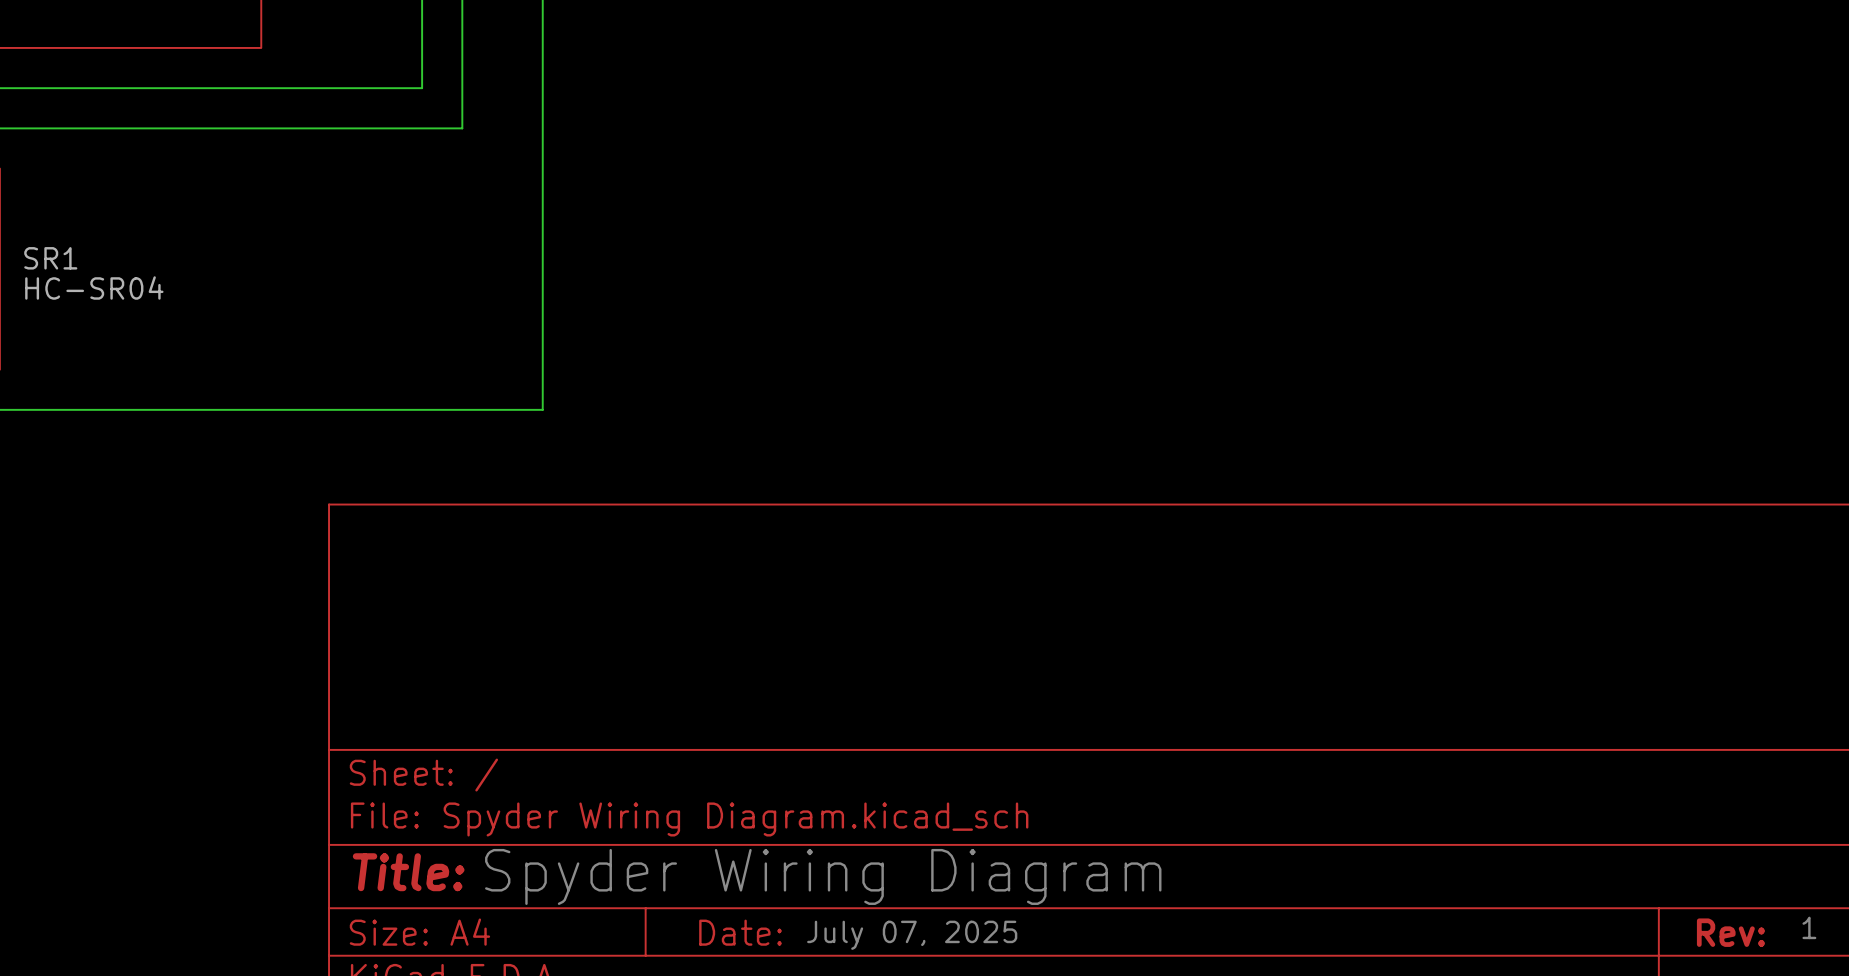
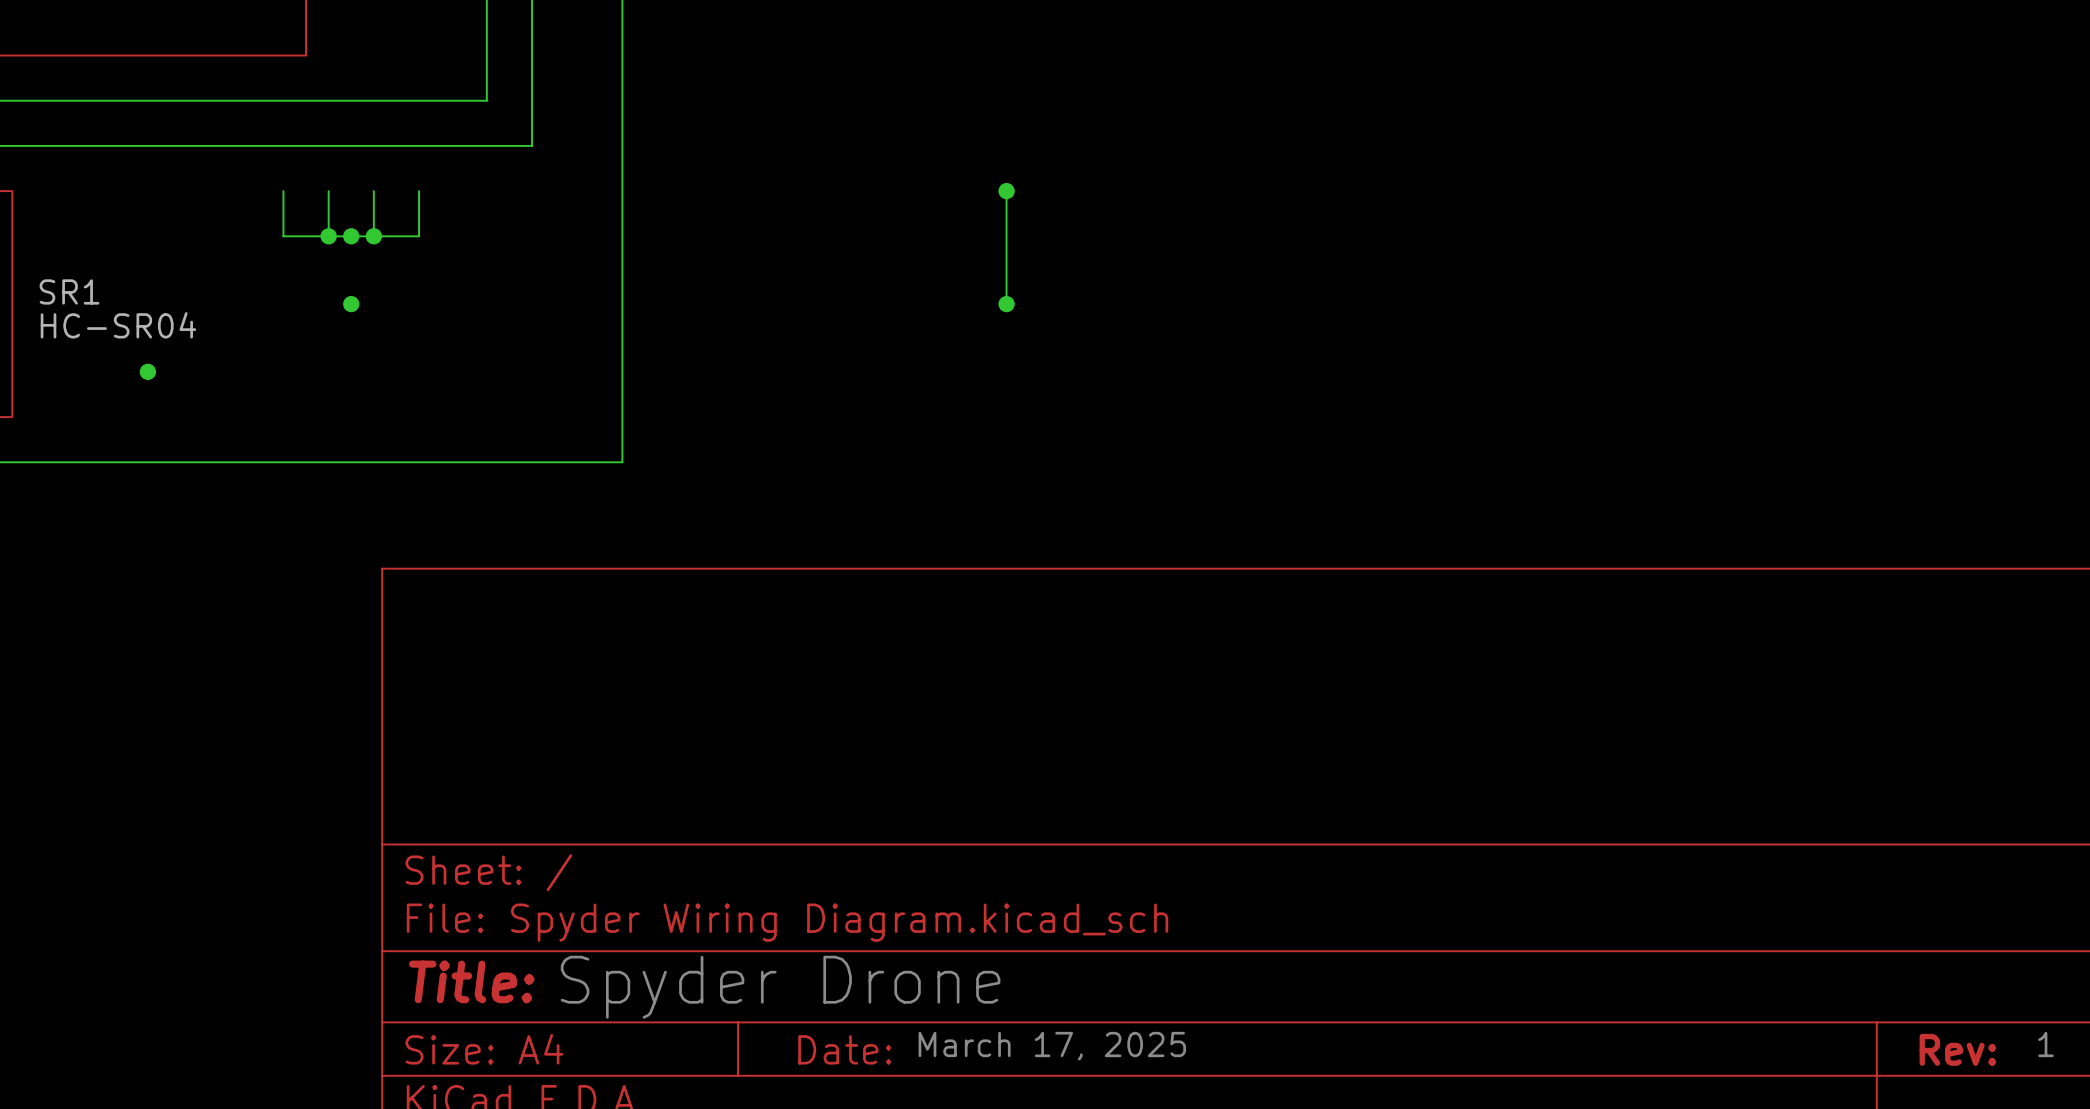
wire: none -> (283, 191) (283, 236) (419, 236) (419, 191)
wire: none -> (328, 191) (328, 236)
wire: none -> (373, 191) (373, 236)
wire: none -> (1006, 191) (1006, 304)
junction: none -> (1006, 191)
junction: none -> (328, 236)
junction: none -> (351, 236)
junction: none -> (373, 236)
junction: none -> (351, 304)
junction: none -> (1006, 304)
junction: none -> (147, 371)
text: none -> Spyder Drone (780, 987)
text: Spyder Wiring Diagram (823, 876) -> none
text: July 07, 2025 (912, 935) -> March 17, 2025 (1052, 1046)

